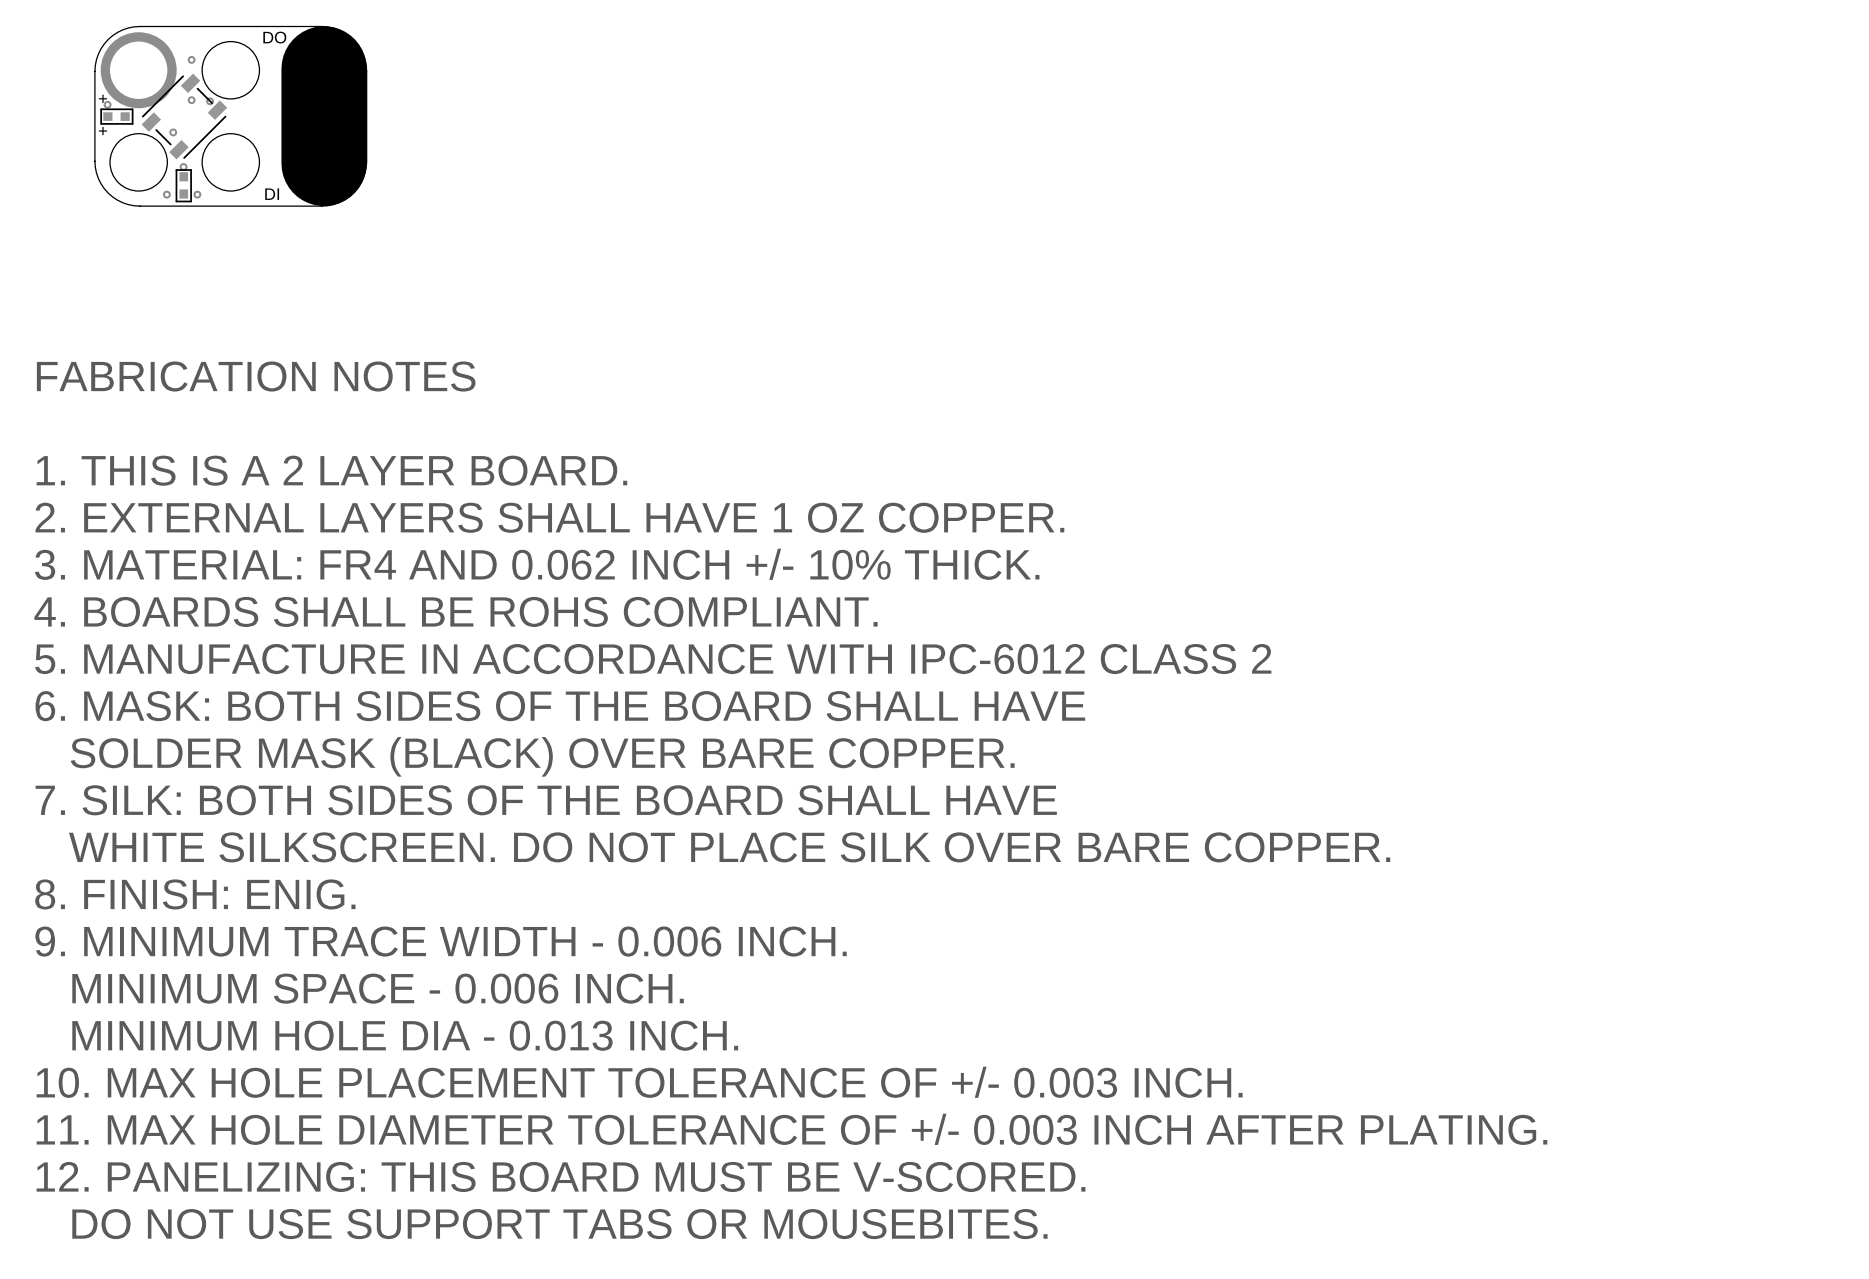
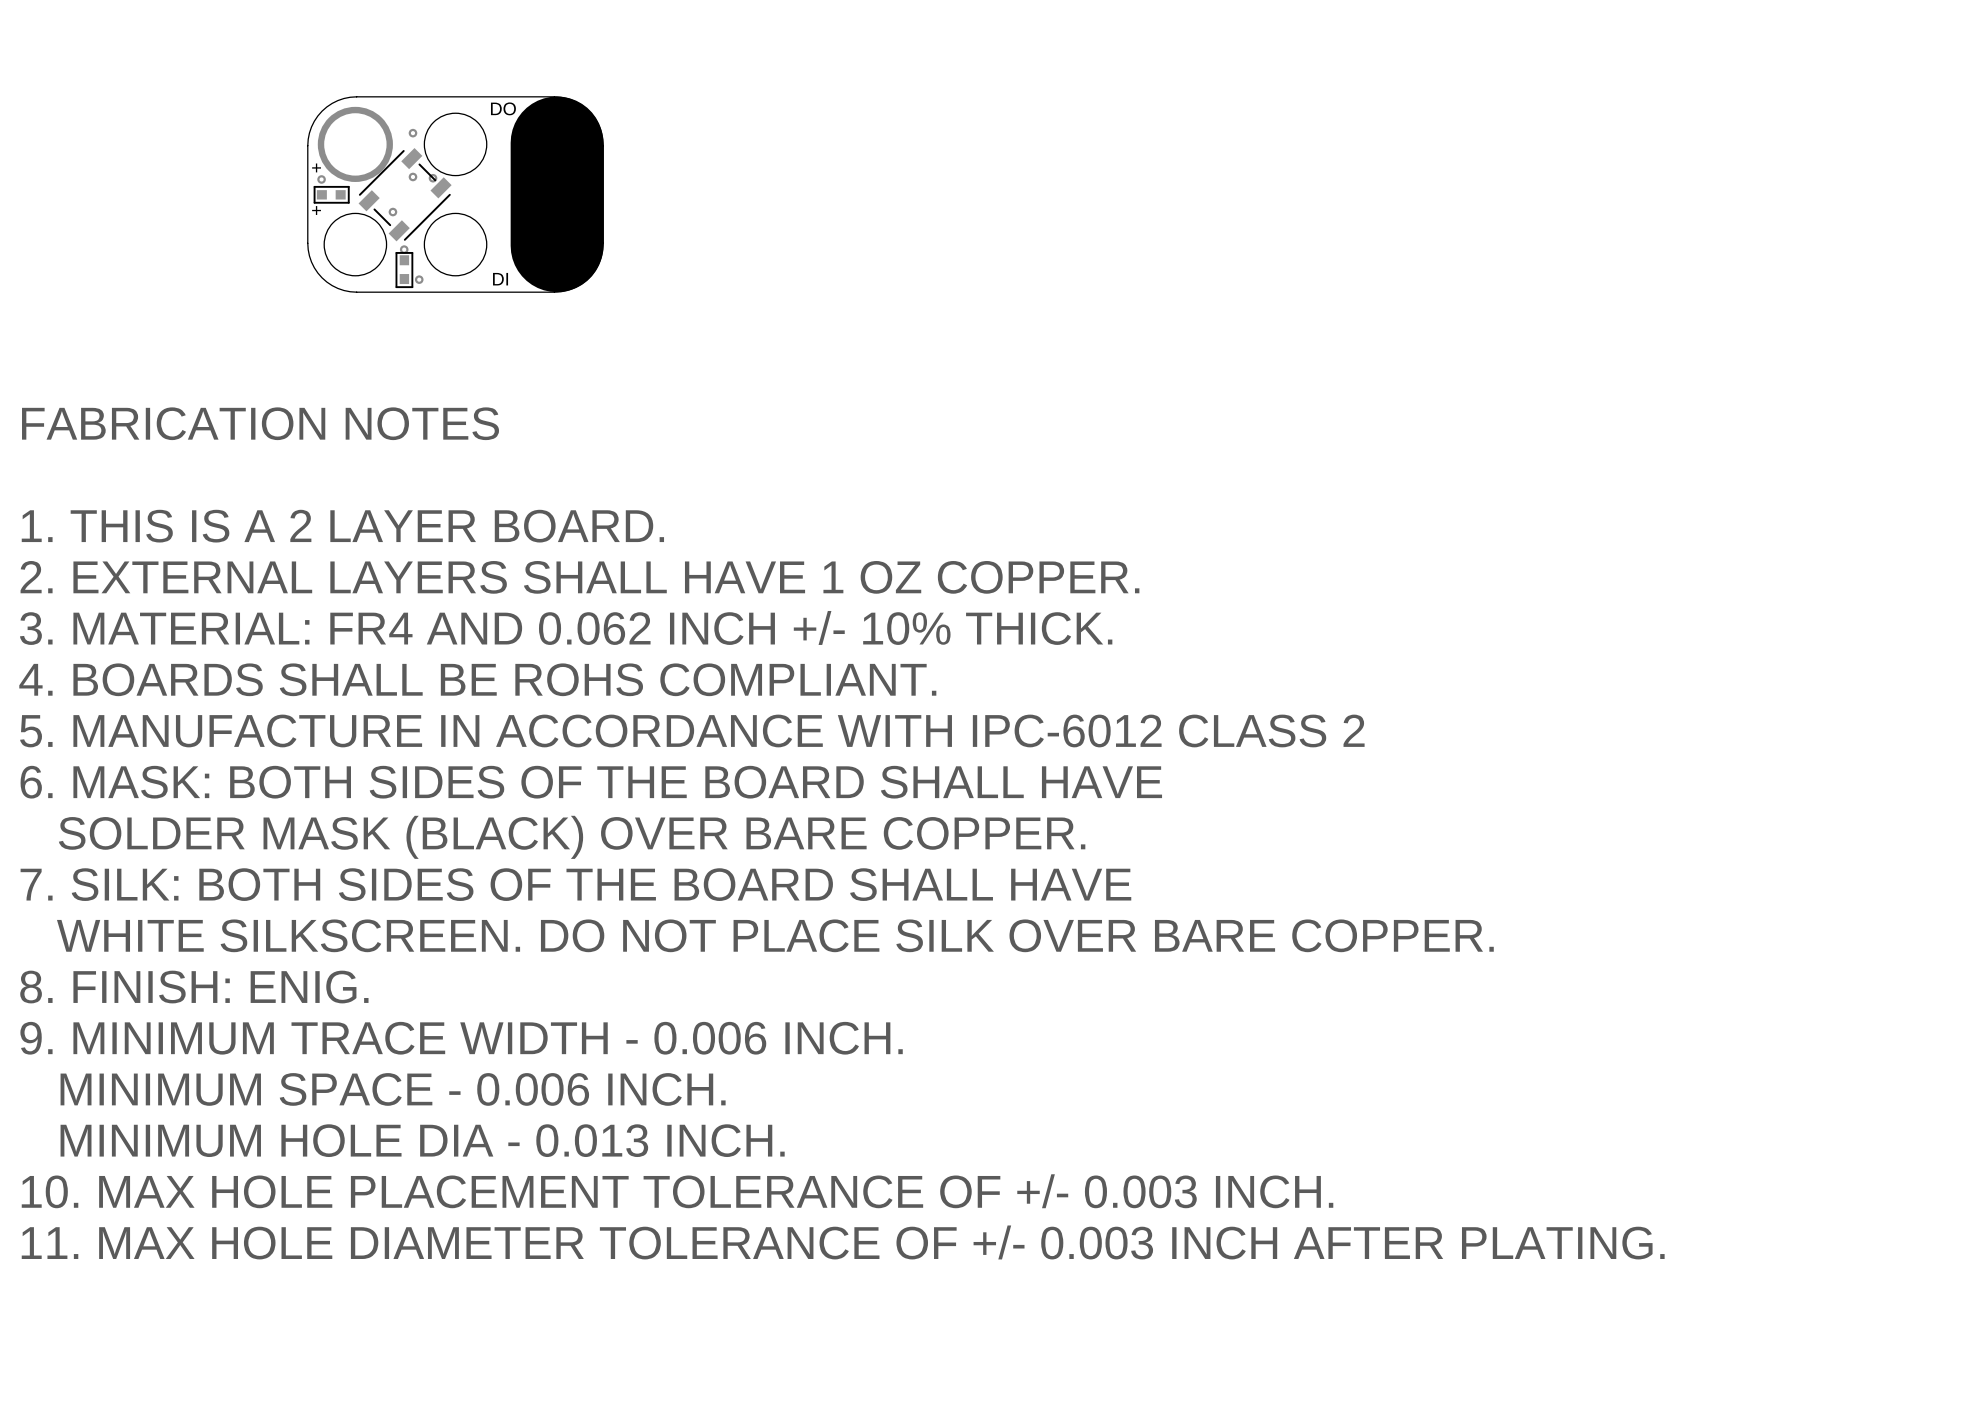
part: (230, 116) -> none
part: none -> (455, 194)
text: 12. PANELIZING: THIS BOARD MUST BE V-SCORED. (561, 1176) -> none
text: DO NOT USE SUPPORT TABS OR MOUSEBITES. (559, 1224) -> none

